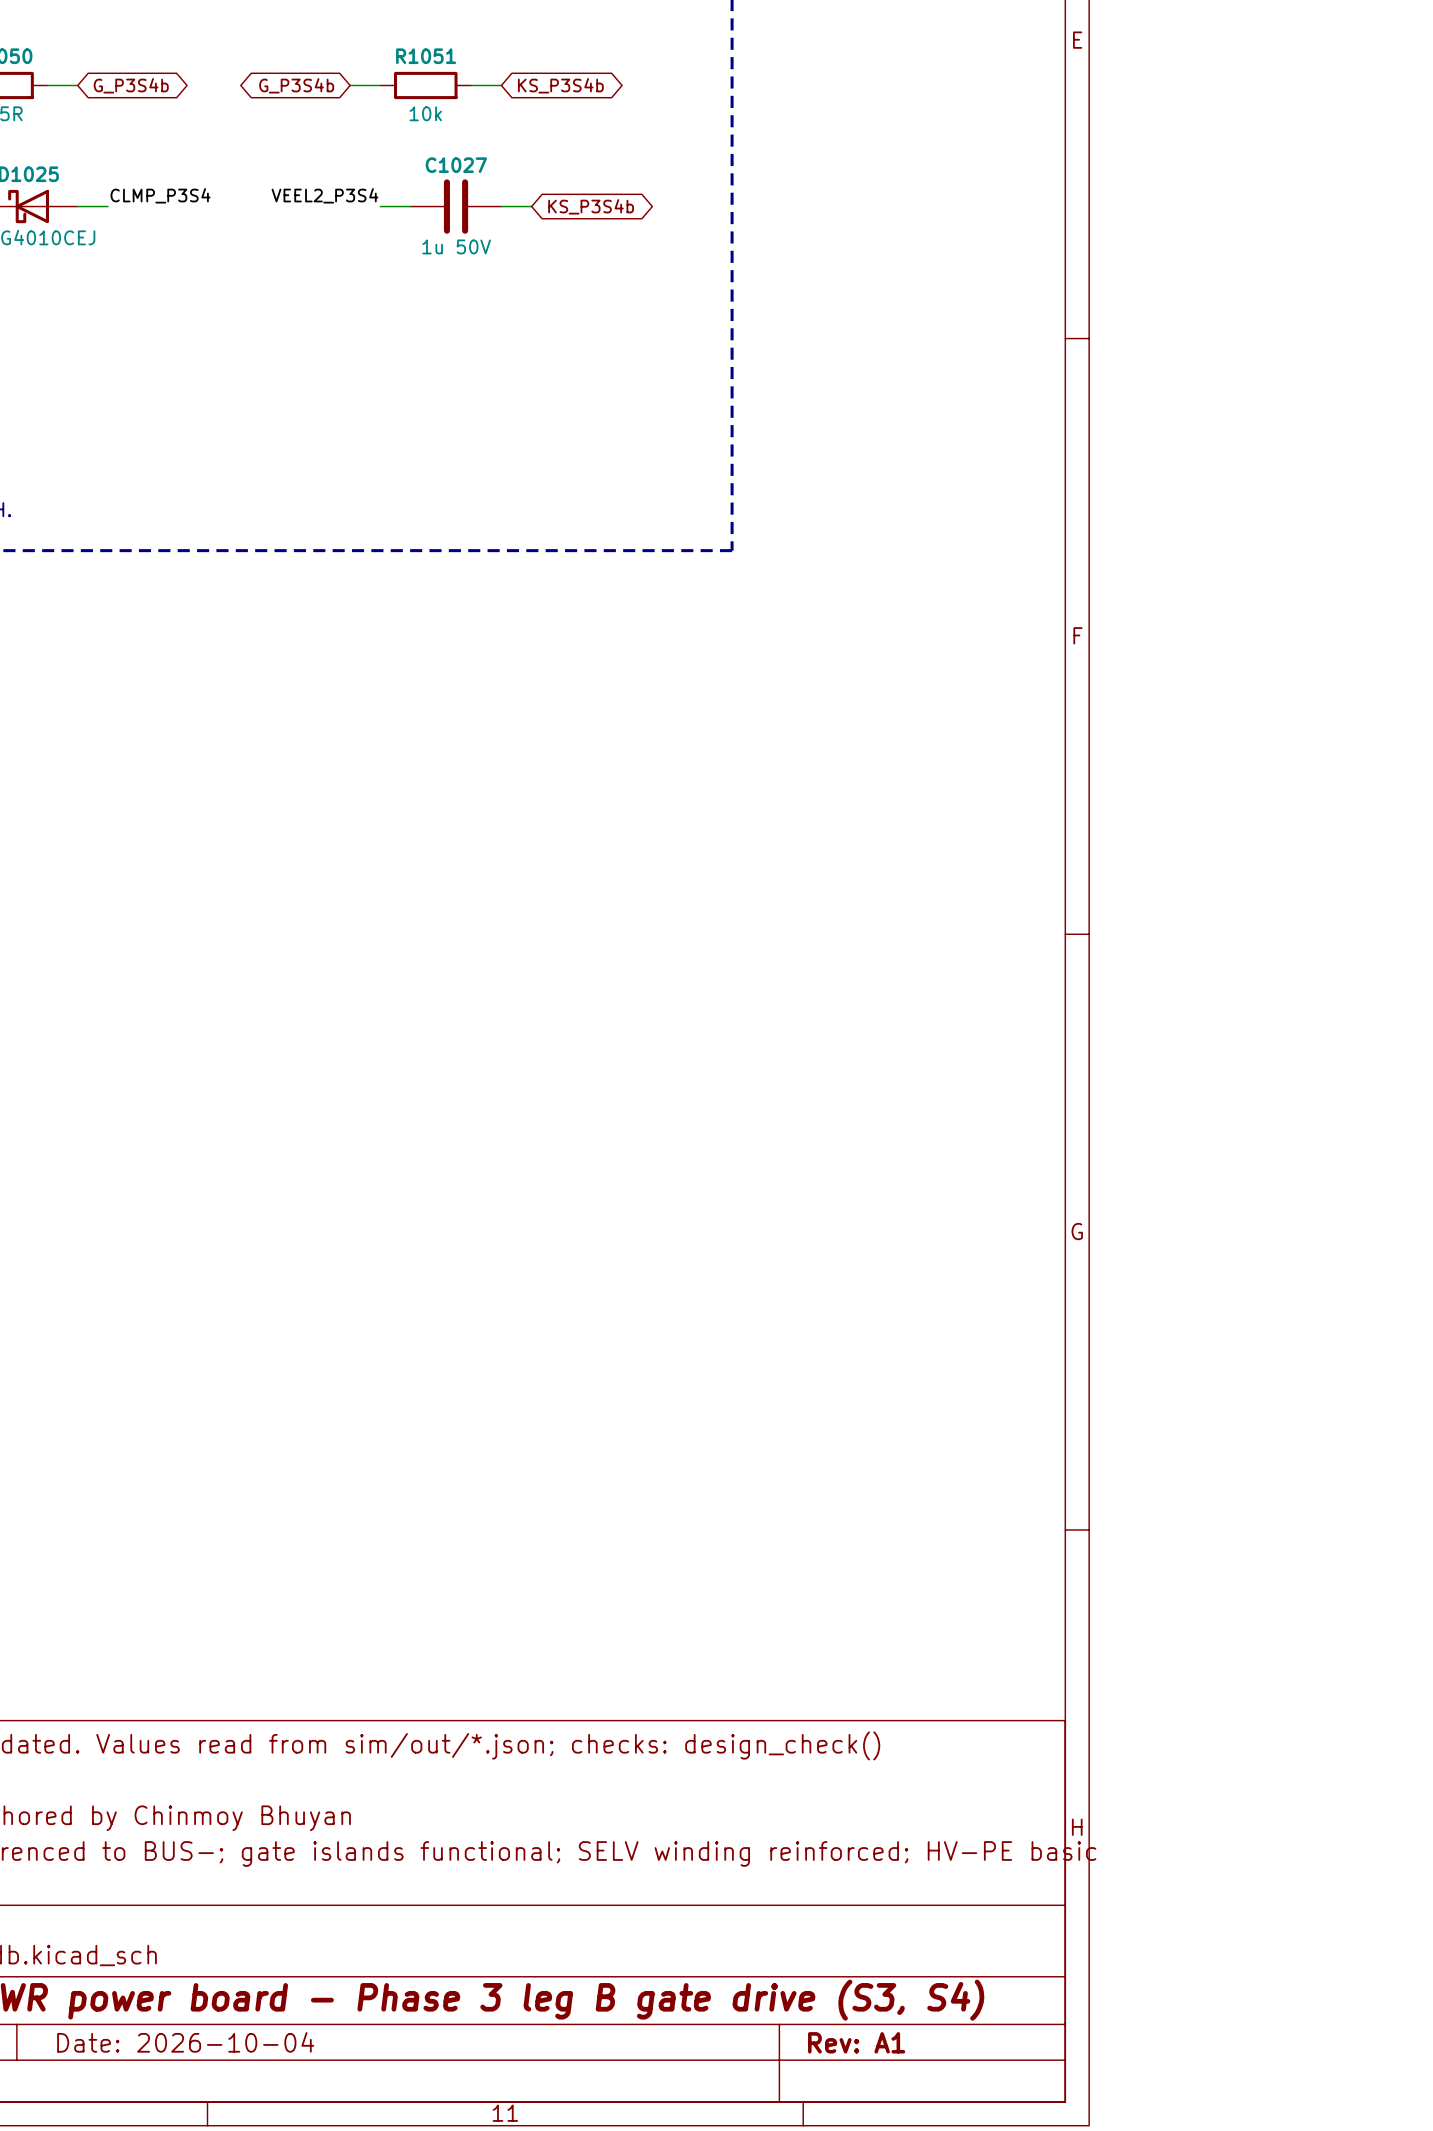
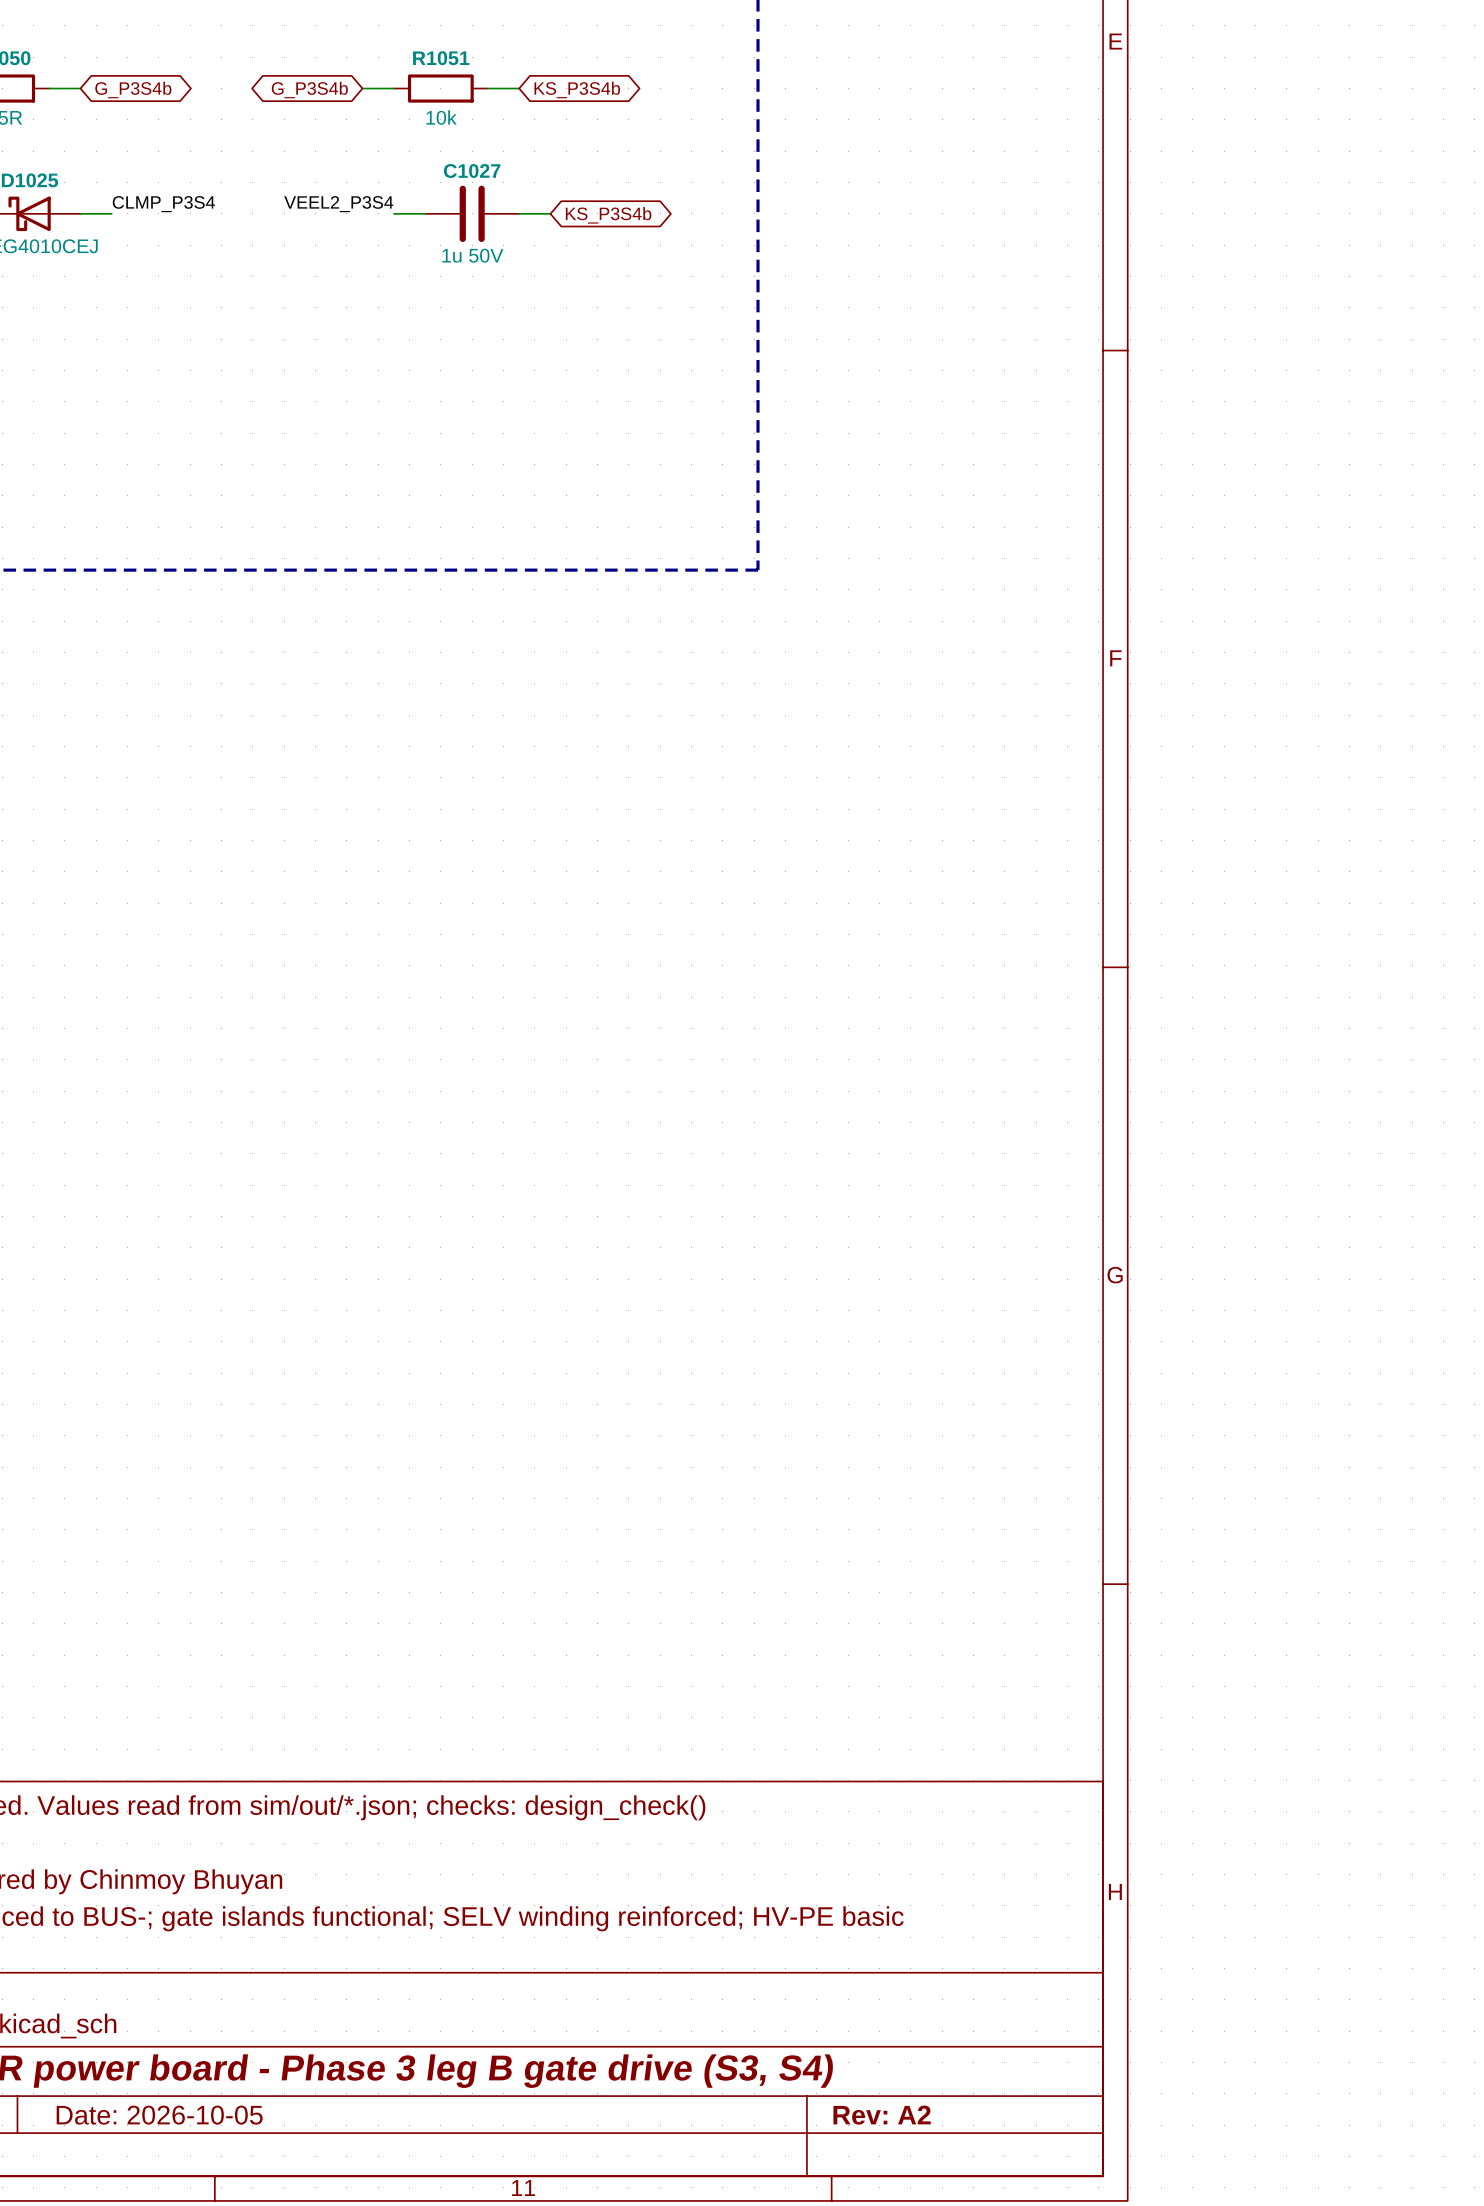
title block: Date: 2026-10-04 (185, 2042) -> Date: 2026-10-05 (159, 2115)
title block: Rev: A1 (856, 2042) -> Rev: A2 (882, 2115)

